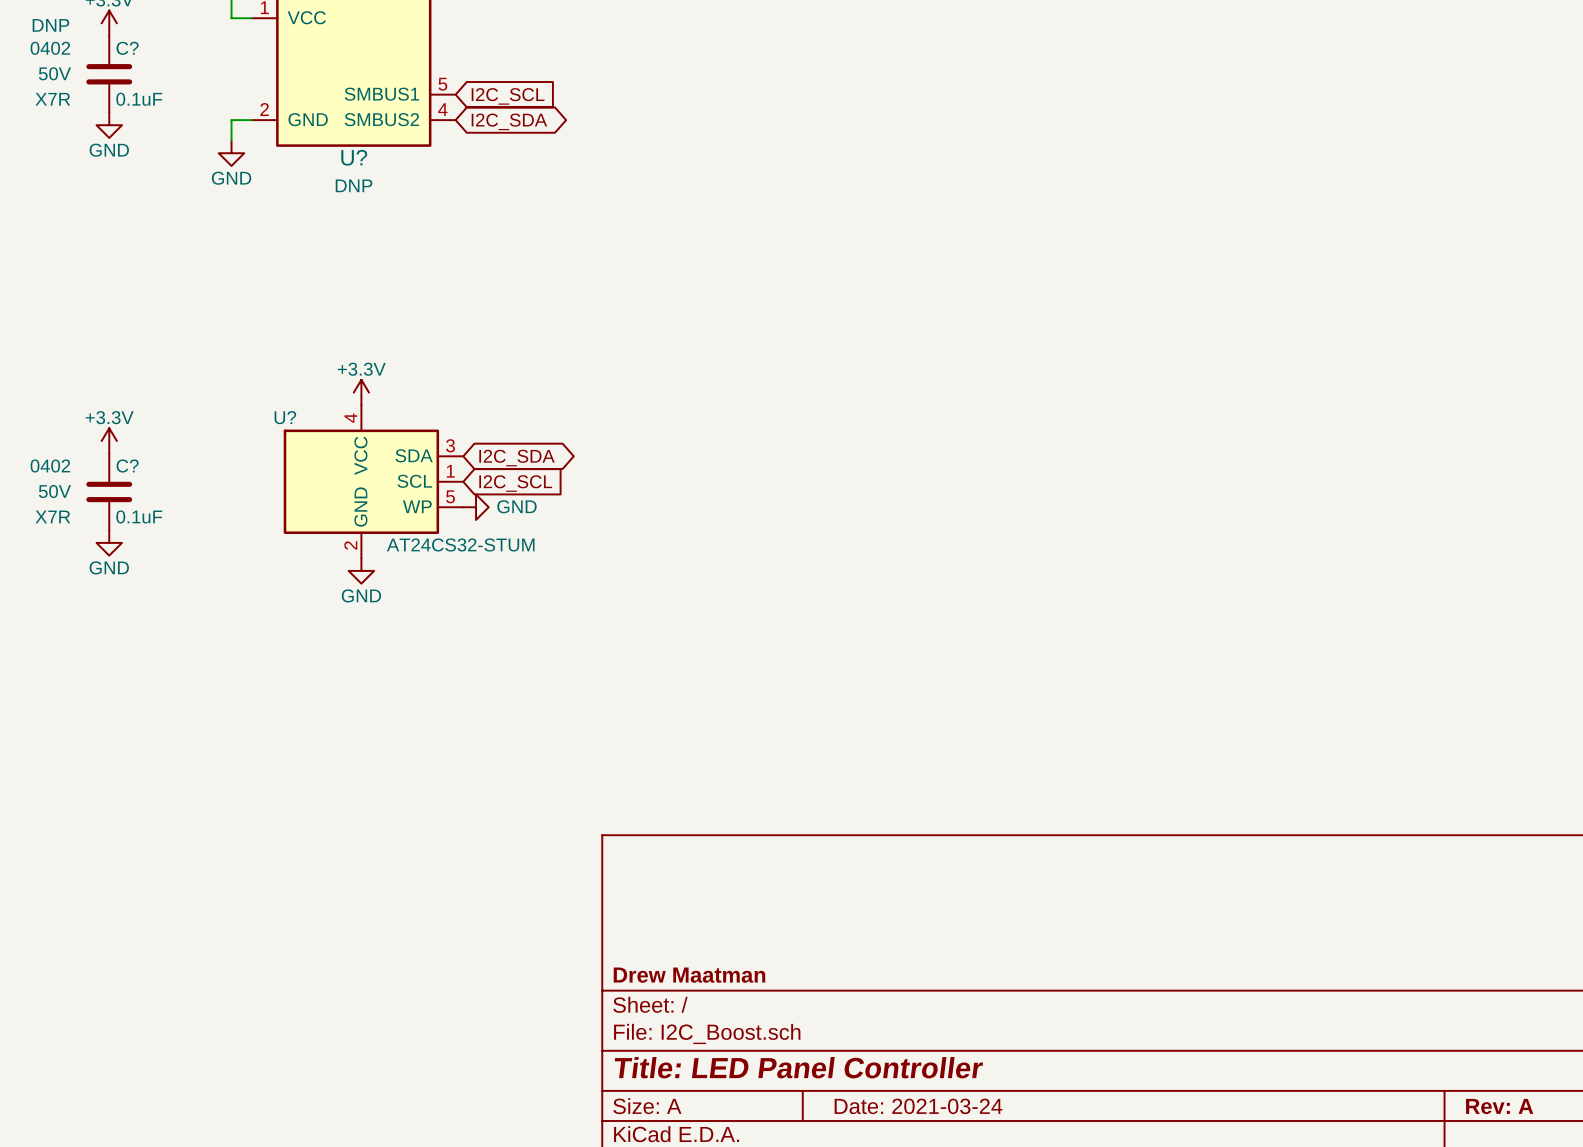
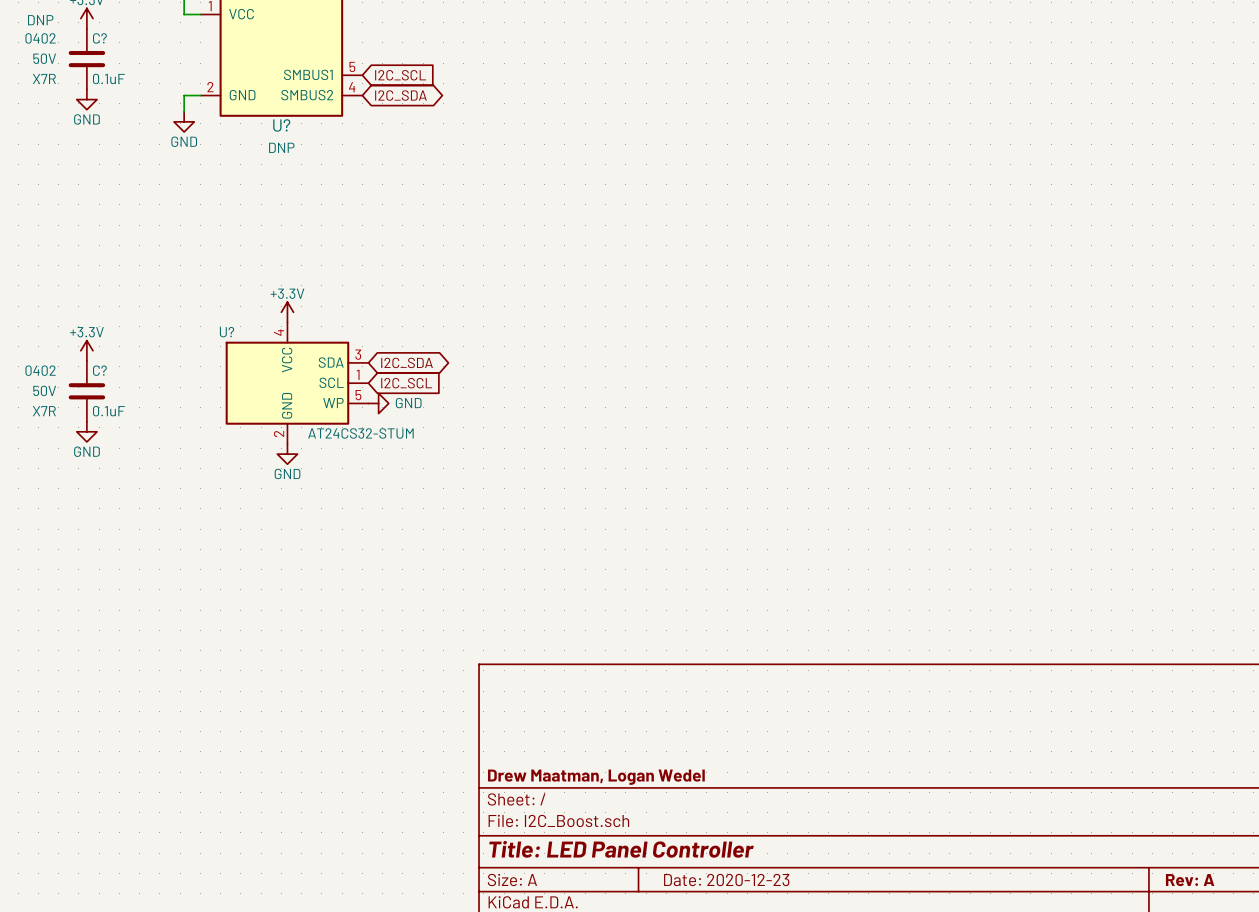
title block: Drew Maatman (689, 975) -> Drew Maatman, Logan Wedel (596, 777)
title block: Date: 2021-03-24 (918, 1106) -> Date: 2020-12-23 (726, 880)

